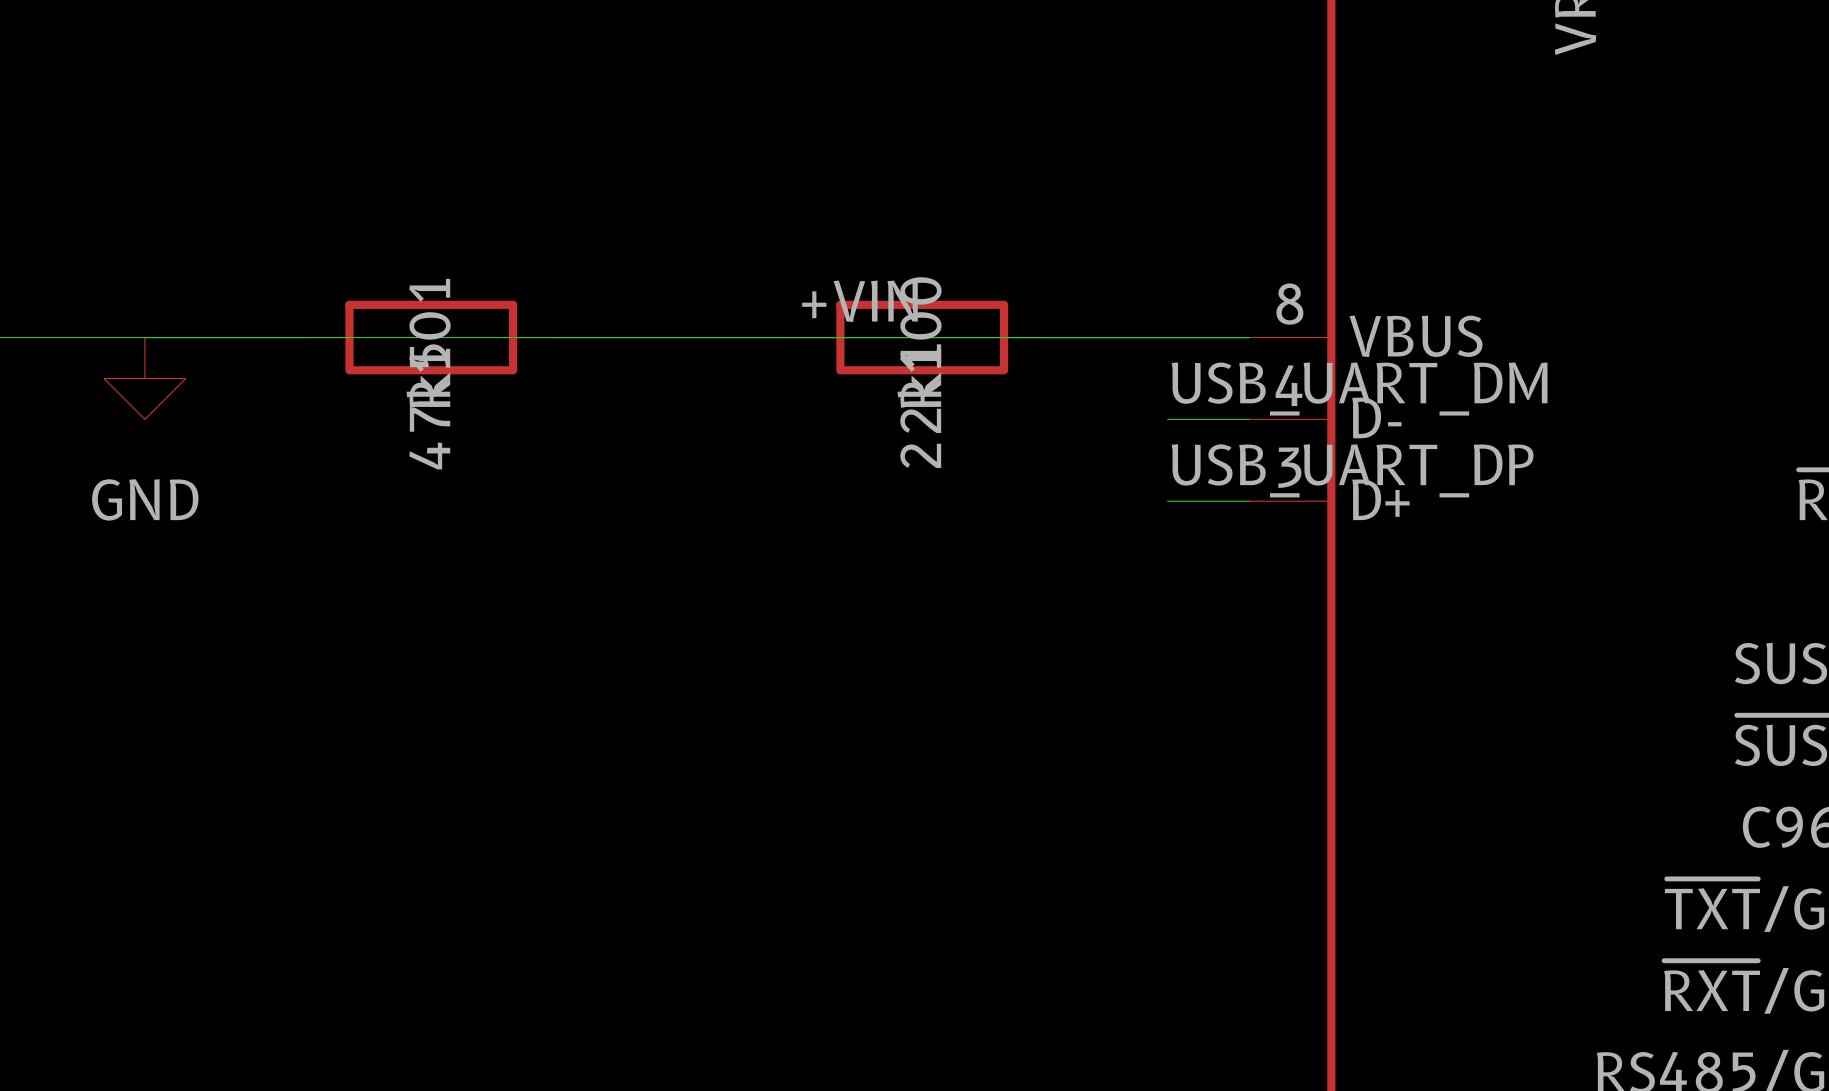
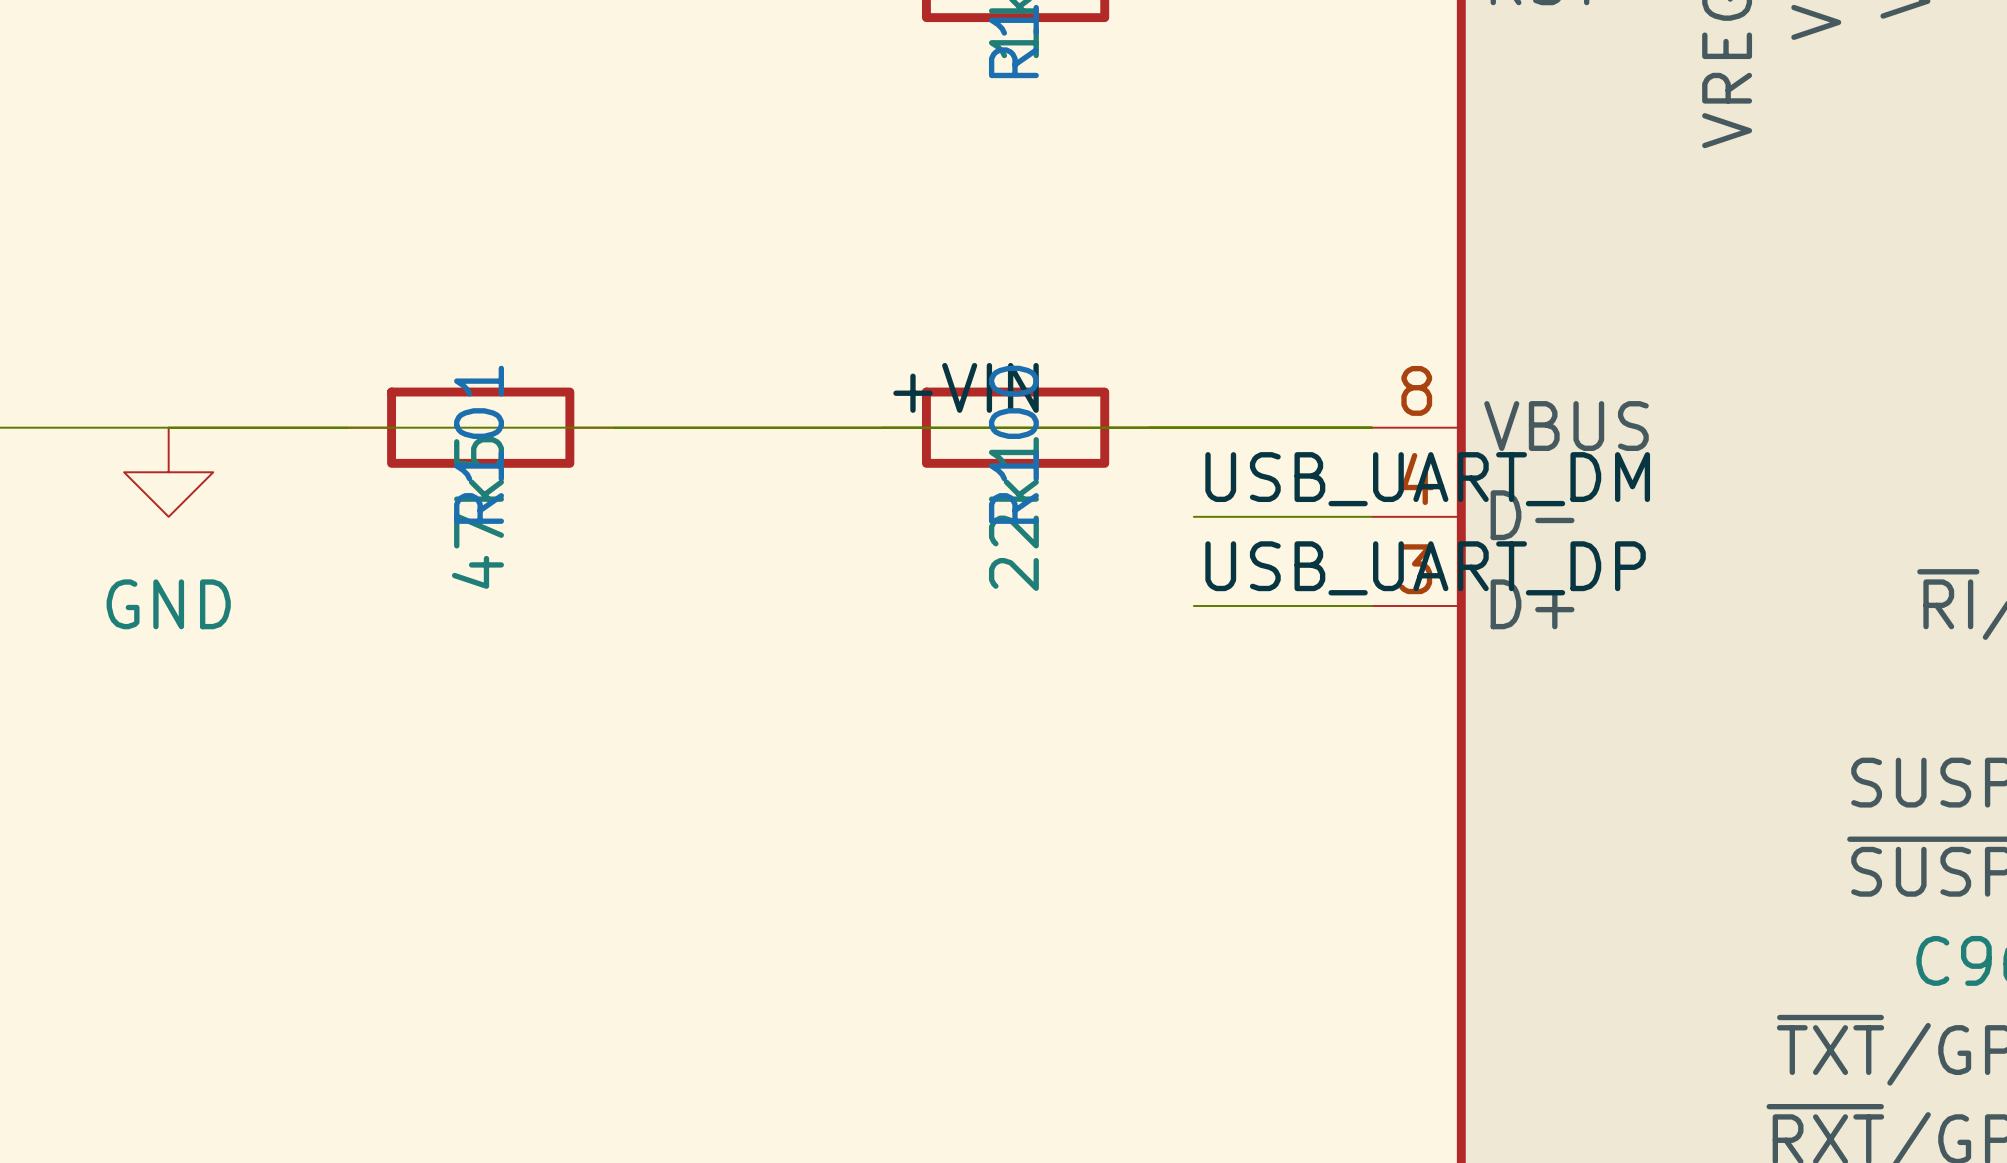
label position: USB_UART_DM (1359, 389) -> USB_UART_DM (1427, 479)
wire: none -> (1193, 516) (1283, 516)
label position: USB_UART_DP (1352, 470) -> USB_UART_DP (1425, 568)
wire: none -> (1193, 605) (1283, 605)

